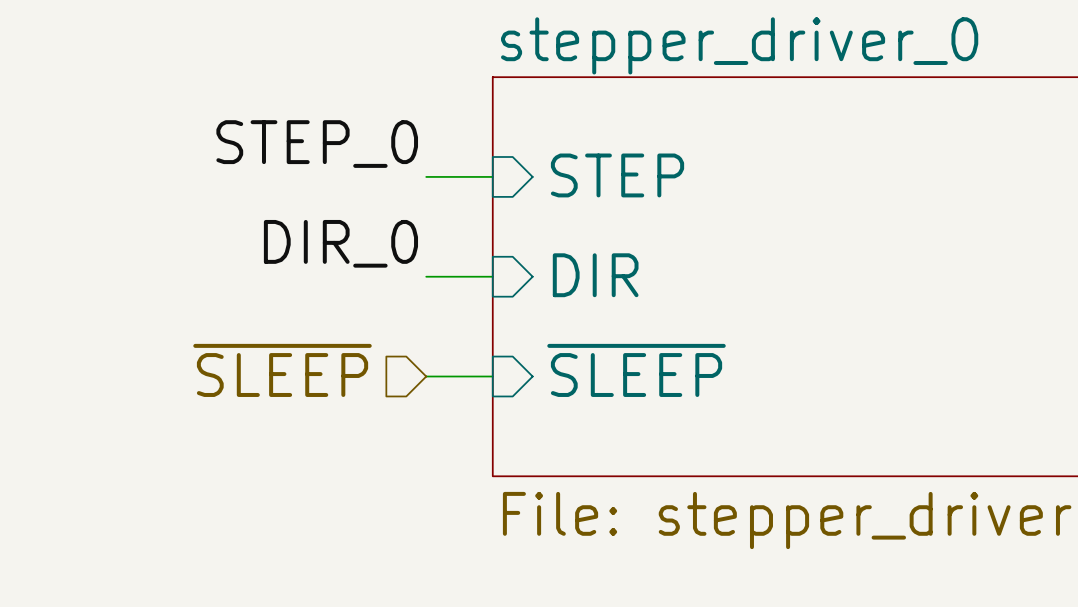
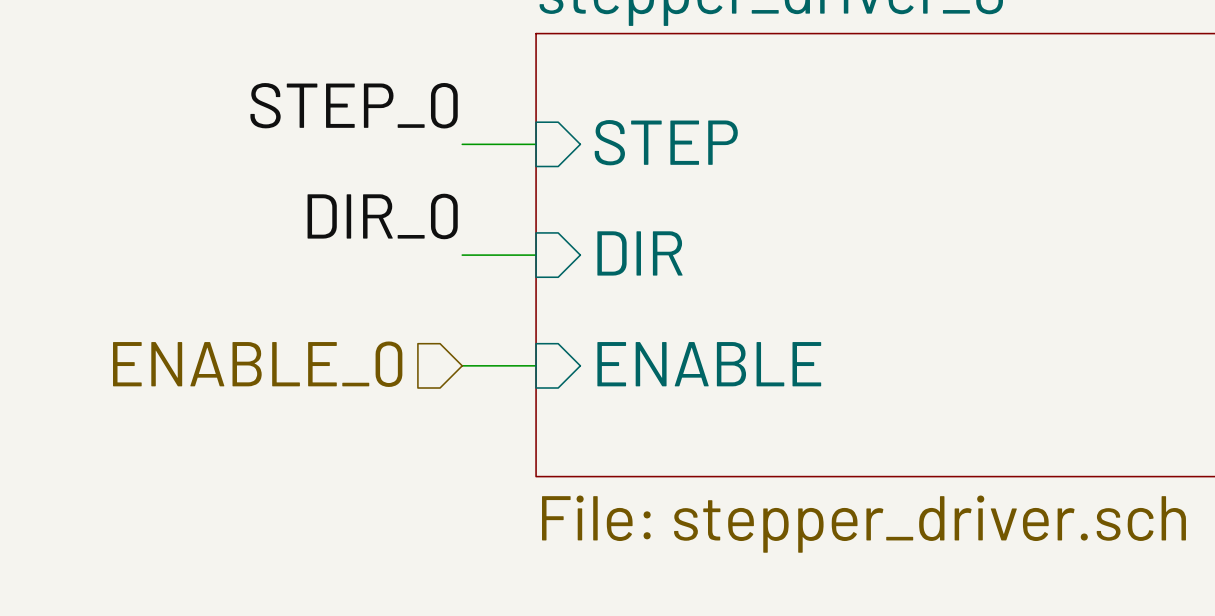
hierarchical label: ~{SLEEP} (282, 370) -> ENABLE_0 (257, 364)
sheet pin: ~{SLEEP} (636, 370) -> ENABLE (709, 364)

